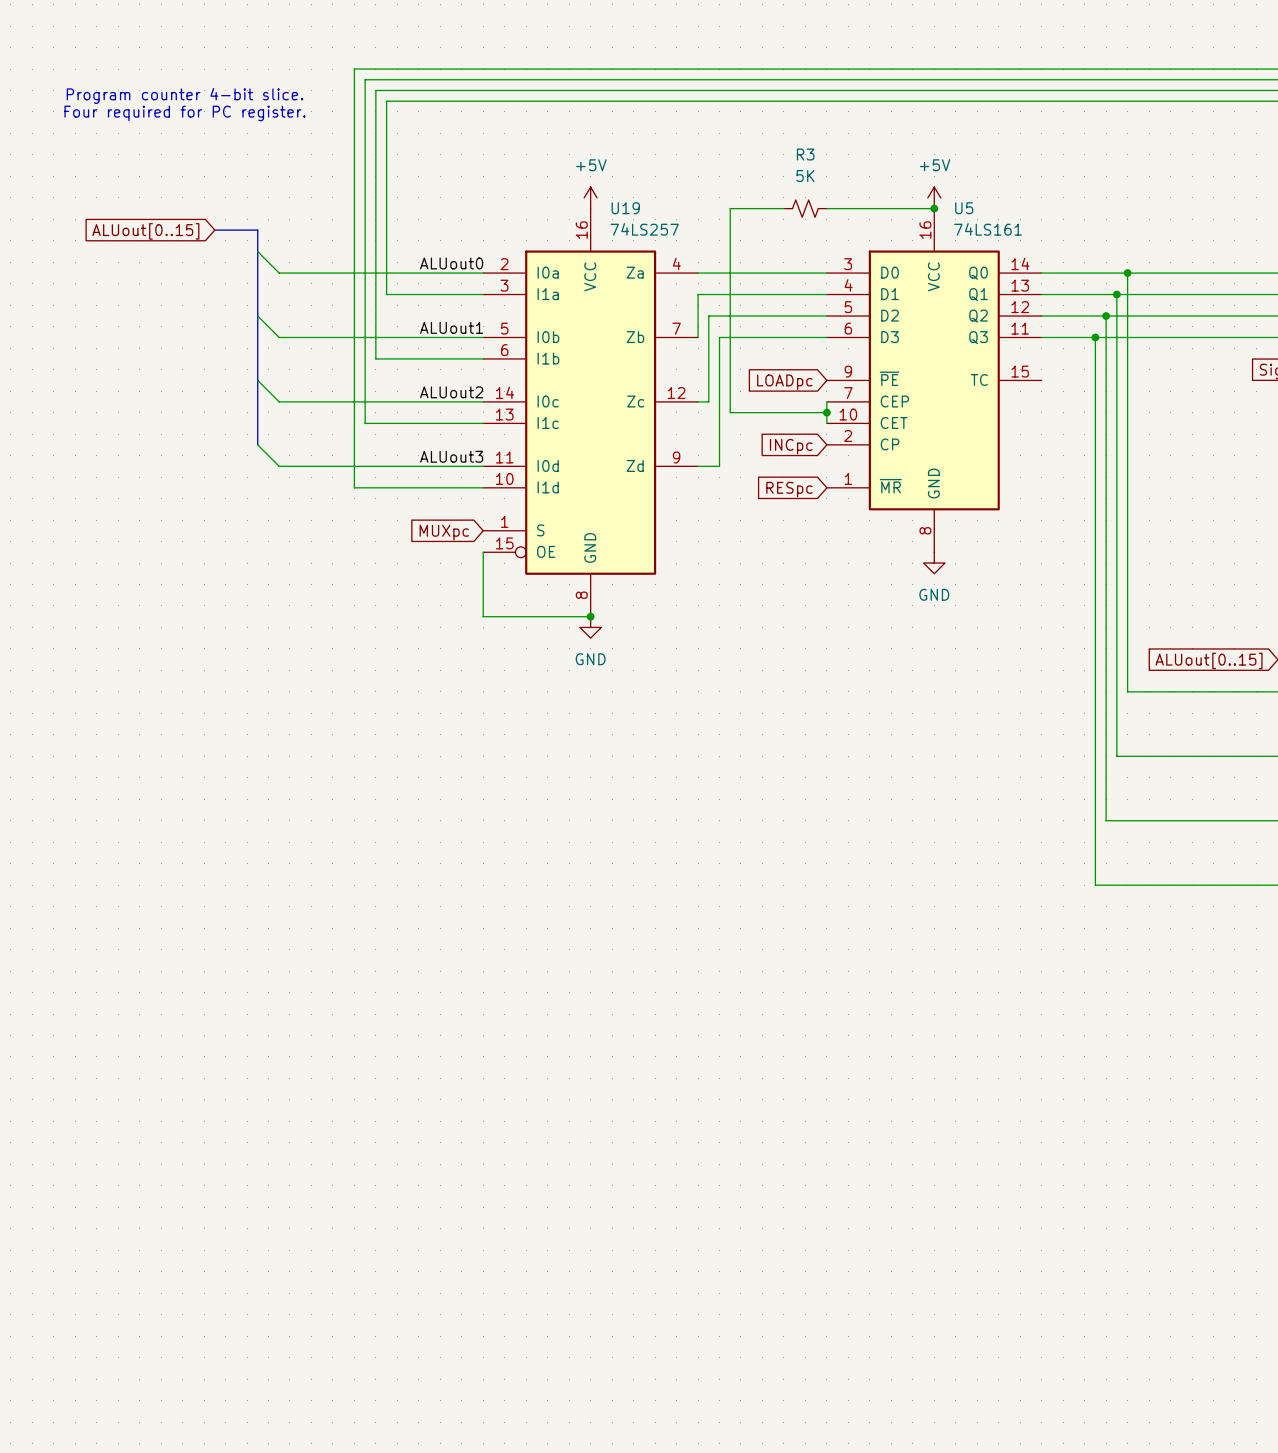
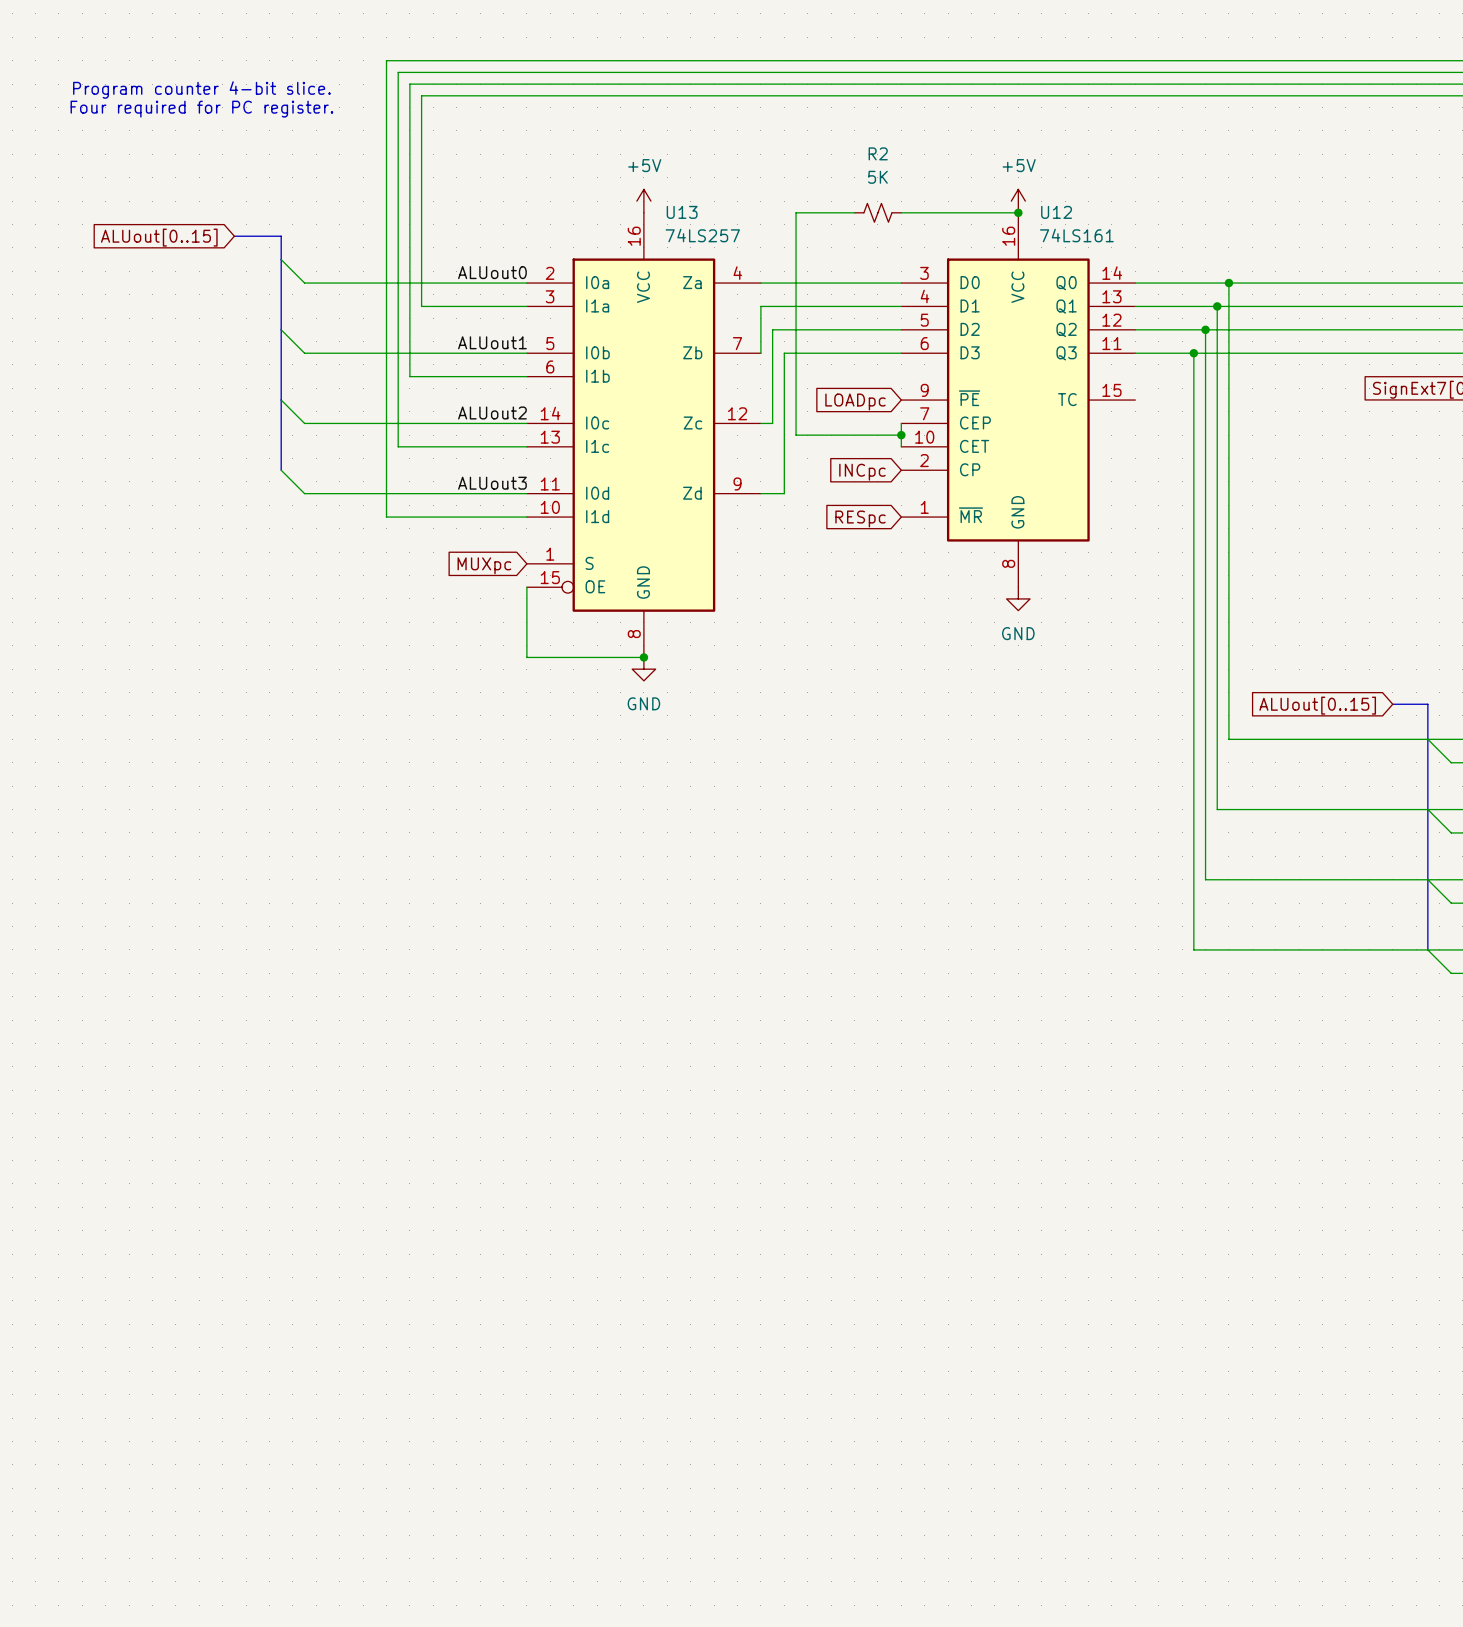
R3 name: R3 (805, 154) -> R2 (878, 153)
U19 name: U19 (625, 208) -> U13 (682, 212)
U5 name: U5 (964, 208) -> U12 (1056, 212)

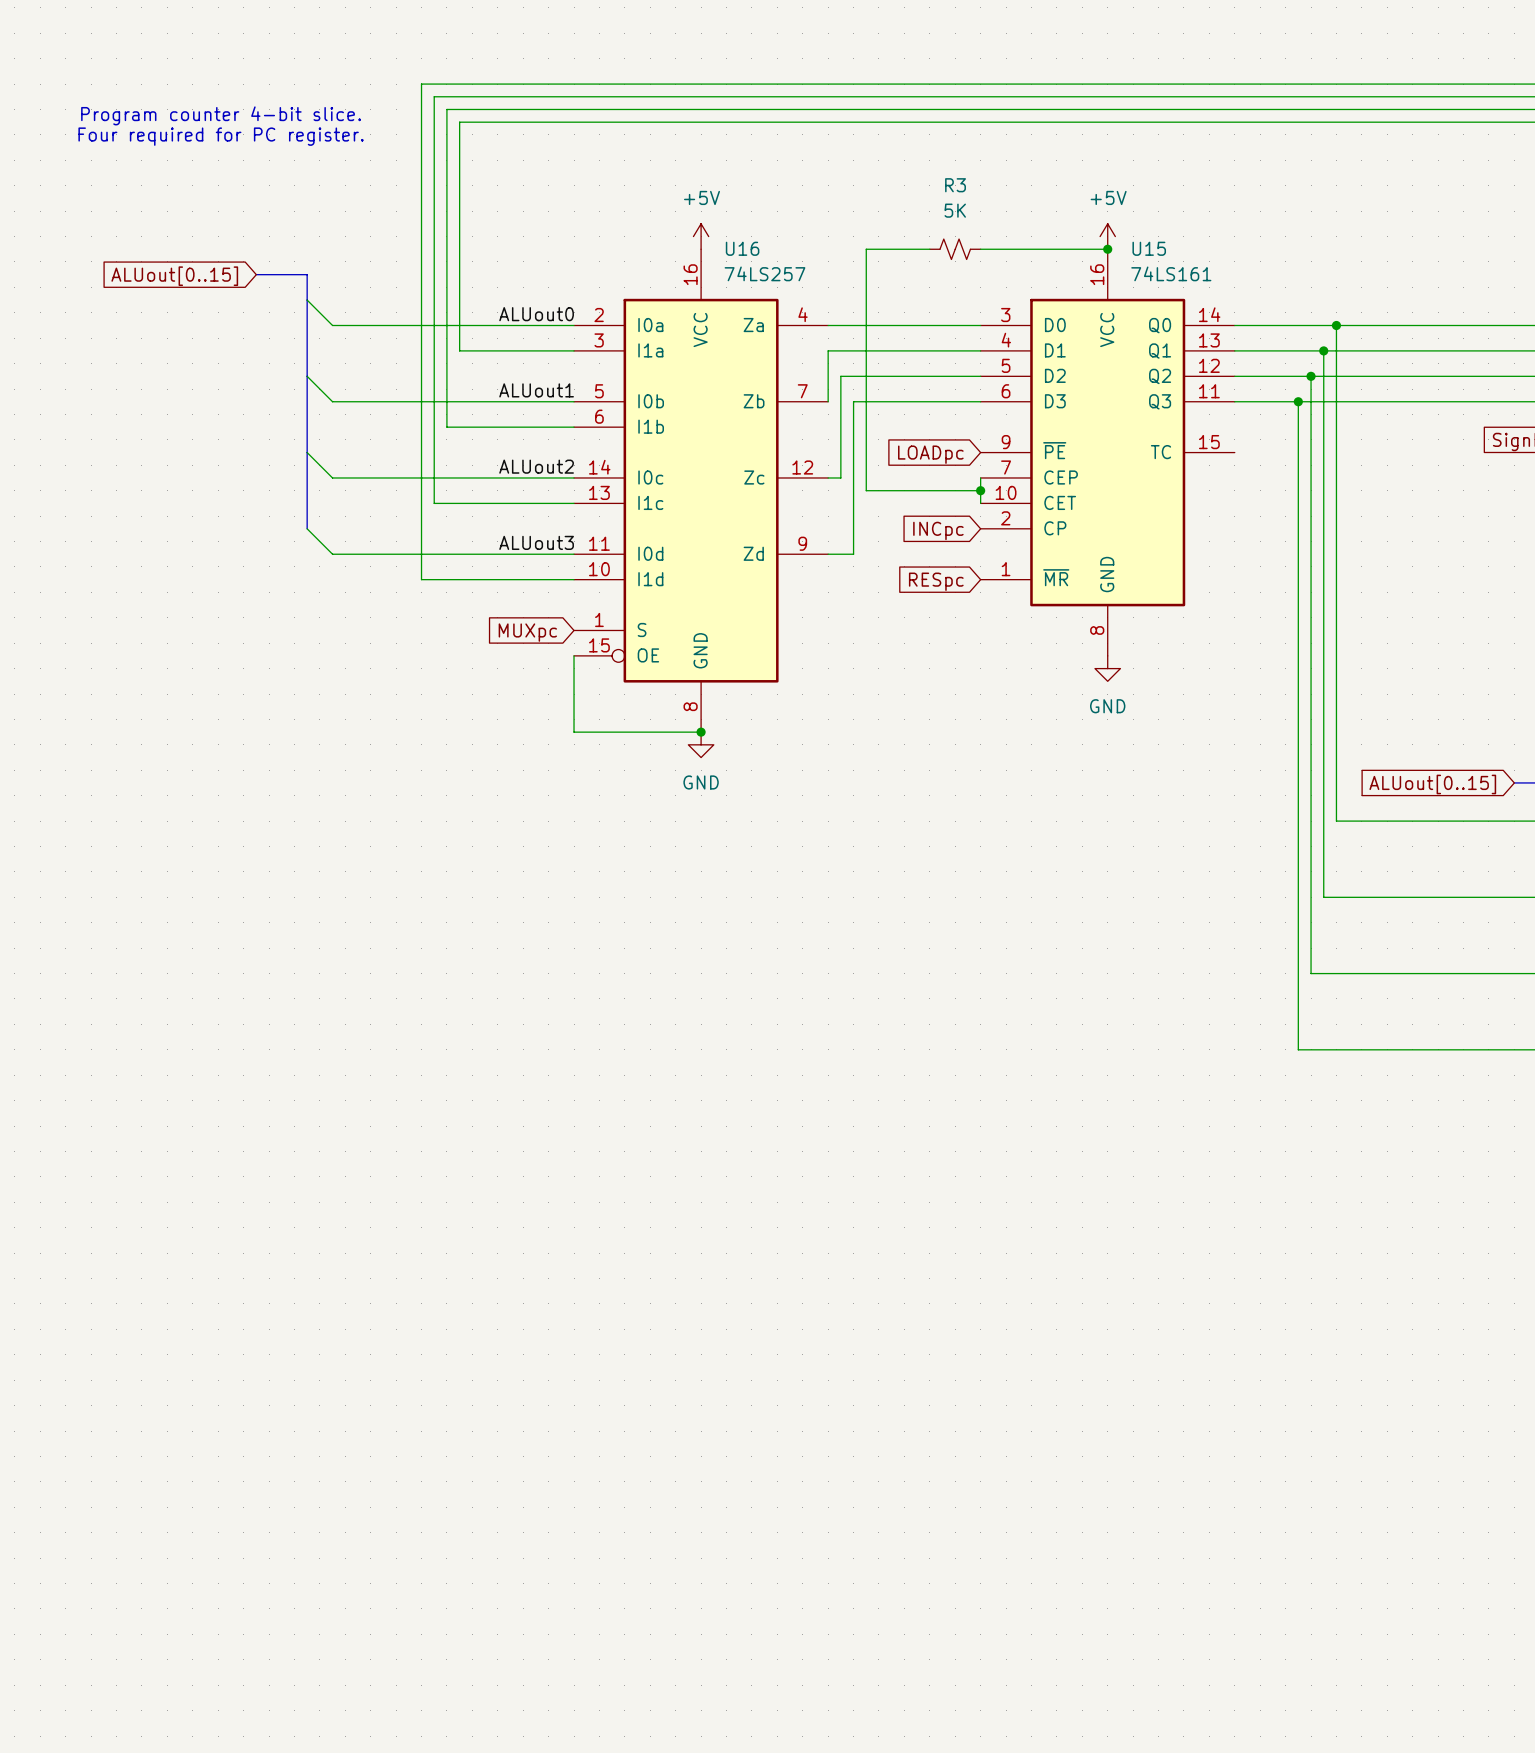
R2 name: R2 (878, 153) -> R3 (955, 185)
U13 name: U13 (682, 212) -> U16 (742, 248)
U12 name: U12 (1056, 212) -> U15 (1149, 248)

